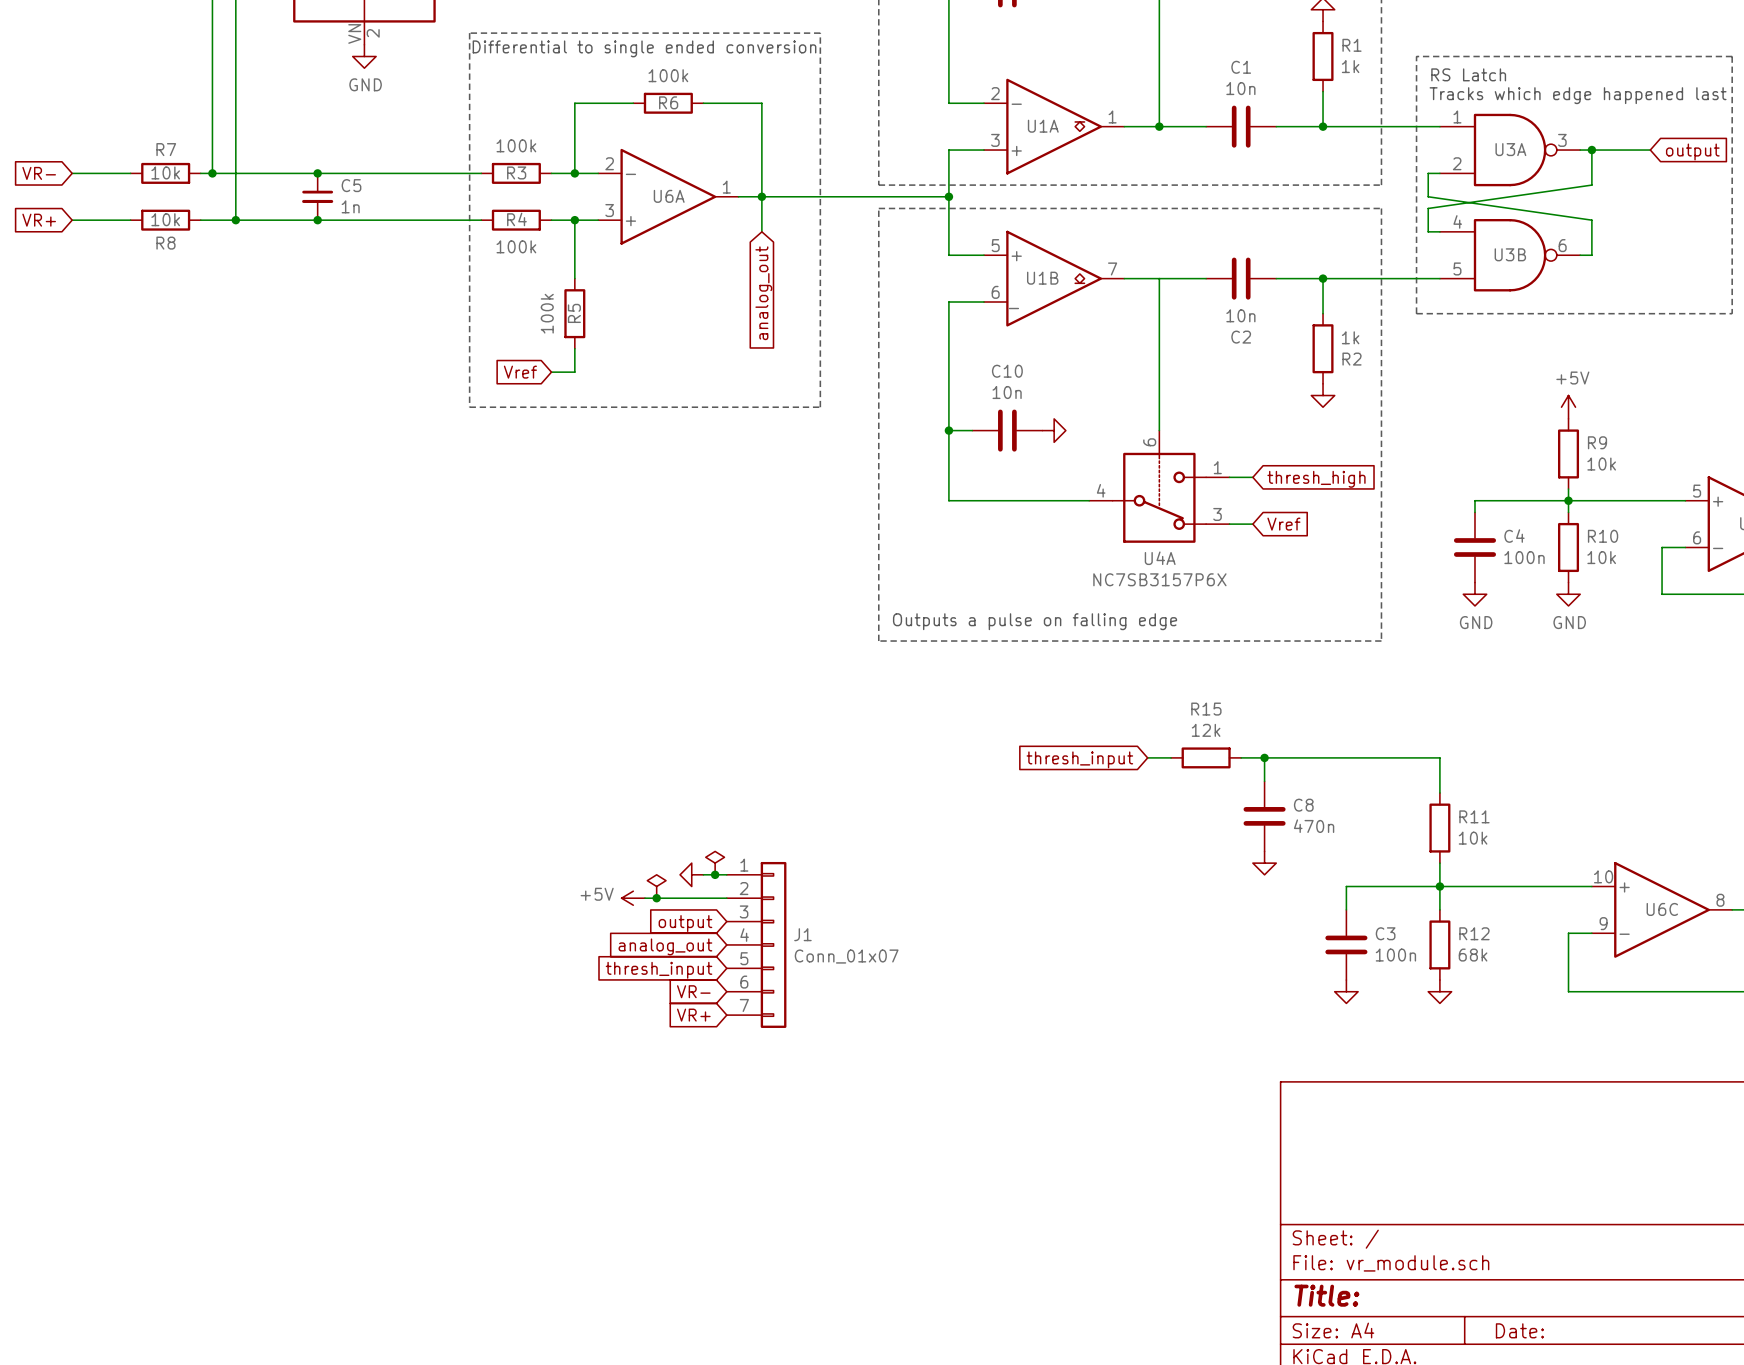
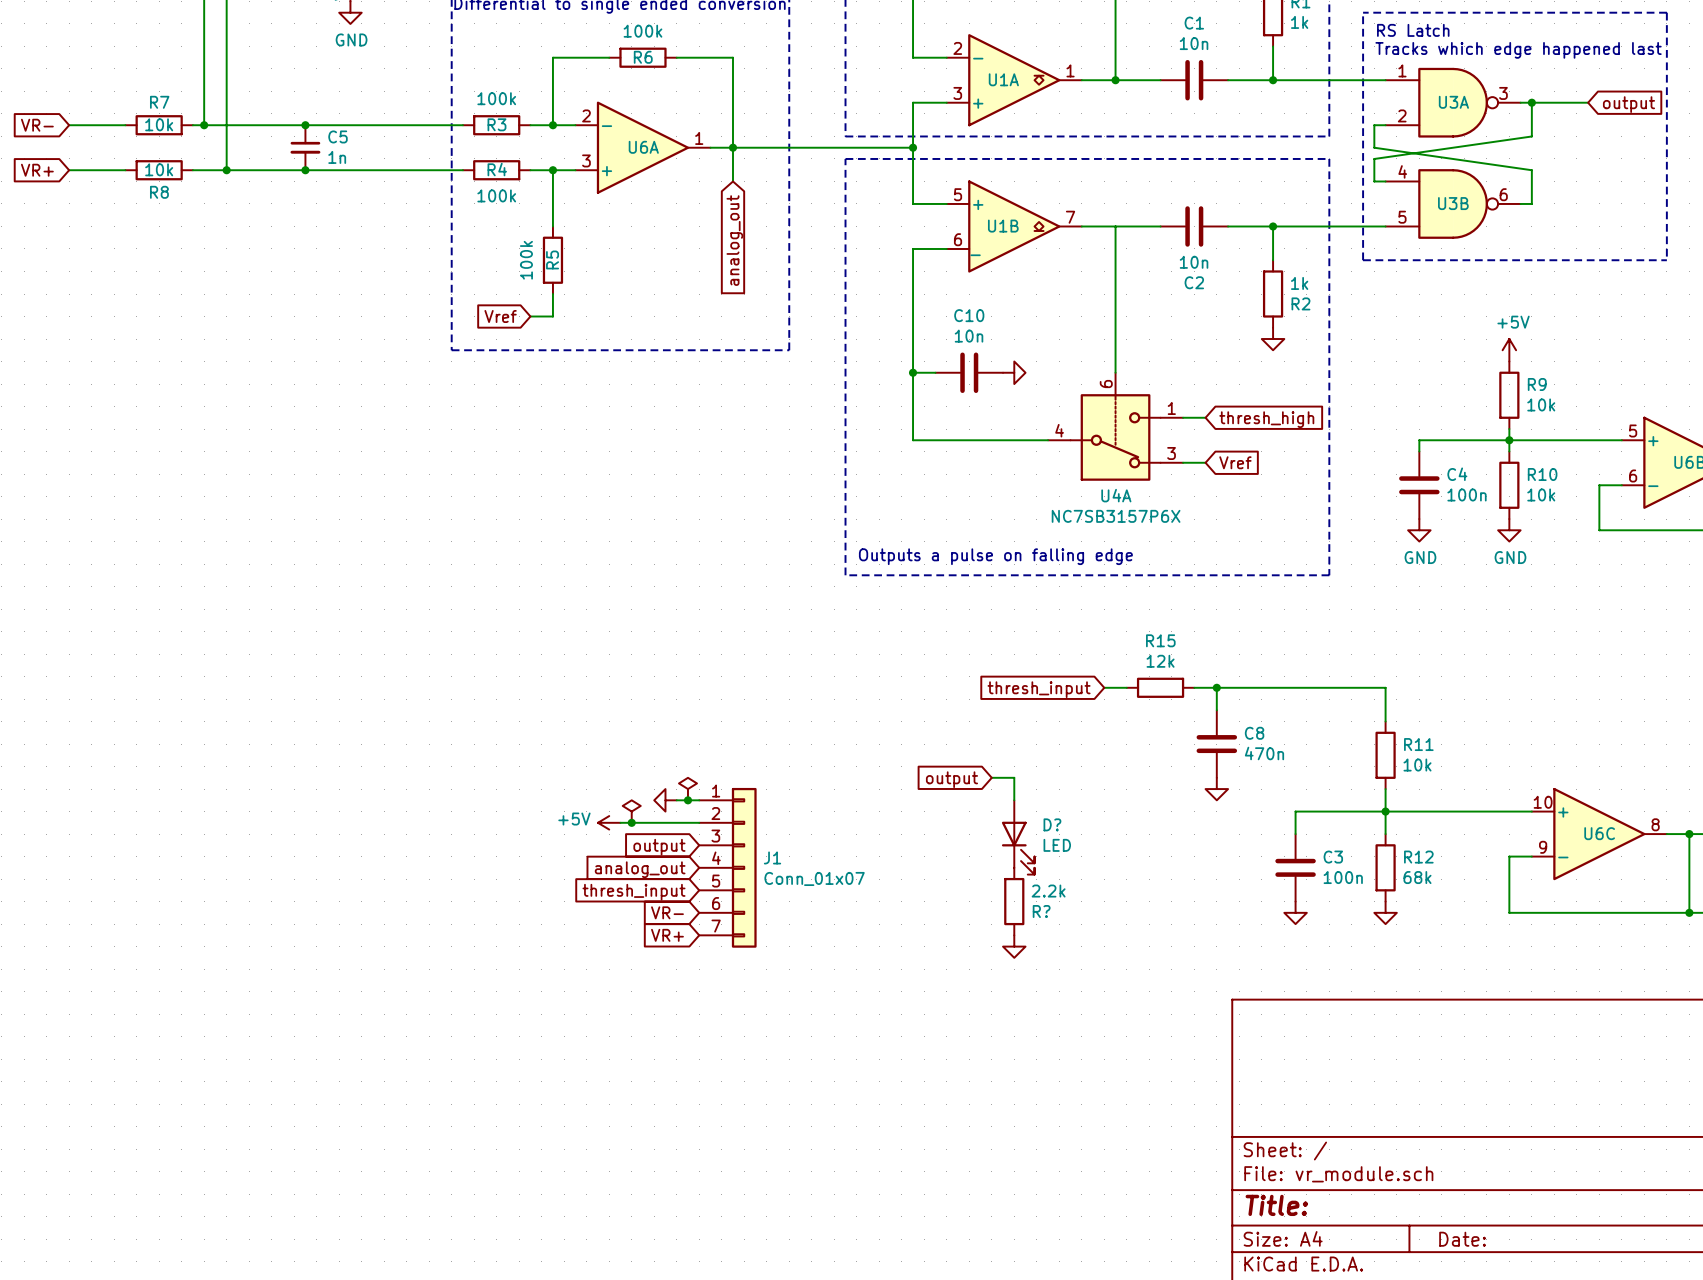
wire: none -> (991, 777) (1014, 777) (1014, 800)
global label: none -> output (951, 779)
D?: none -> LED (1018, 837)
R?: none -> 2.2k (1014, 901)
power symbol: none -> (1014, 946)

